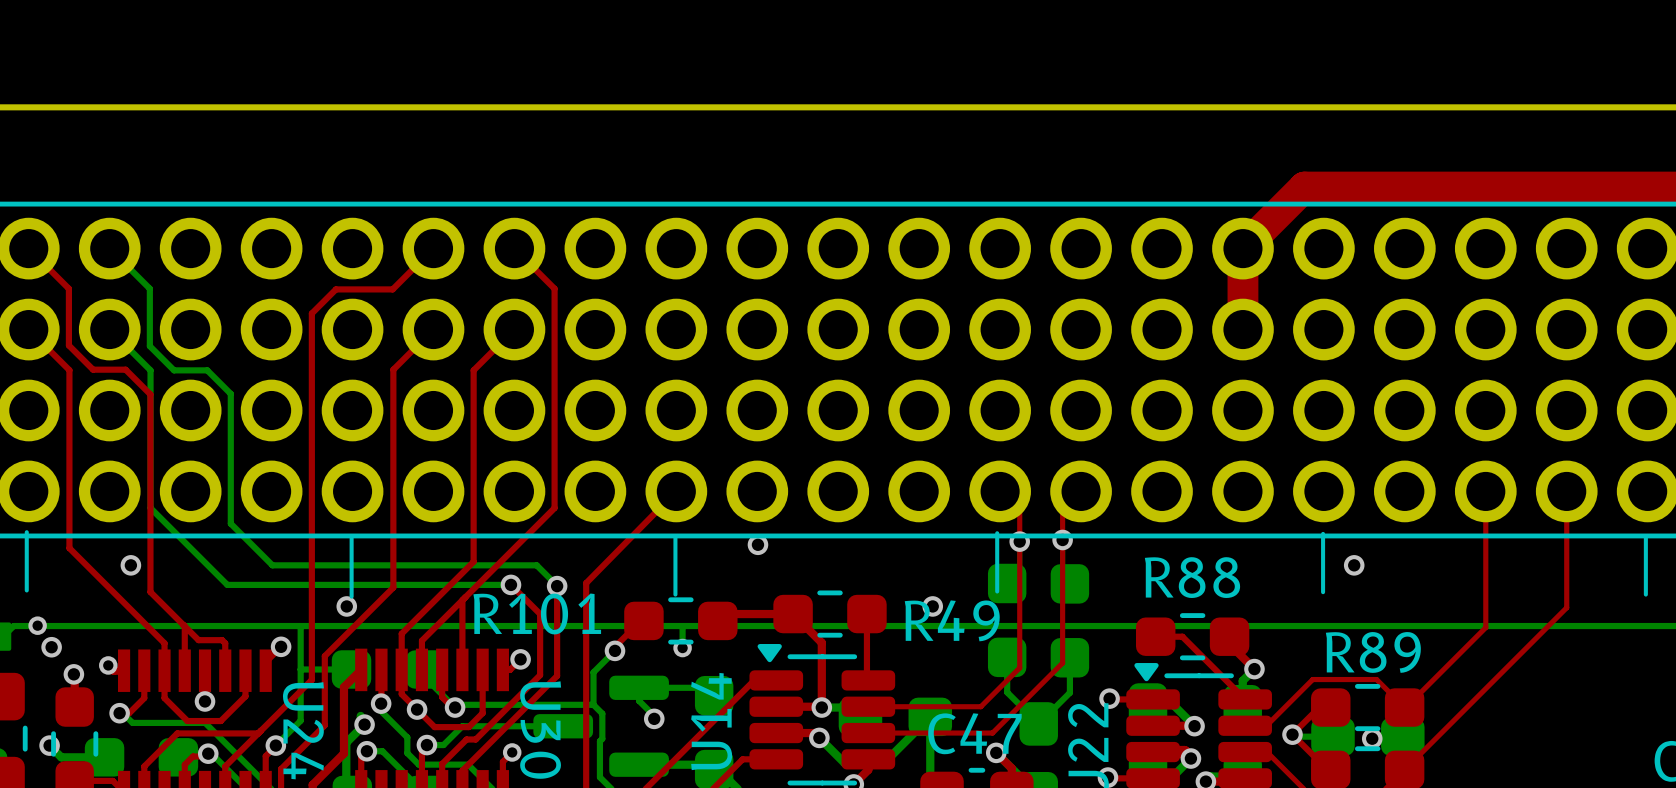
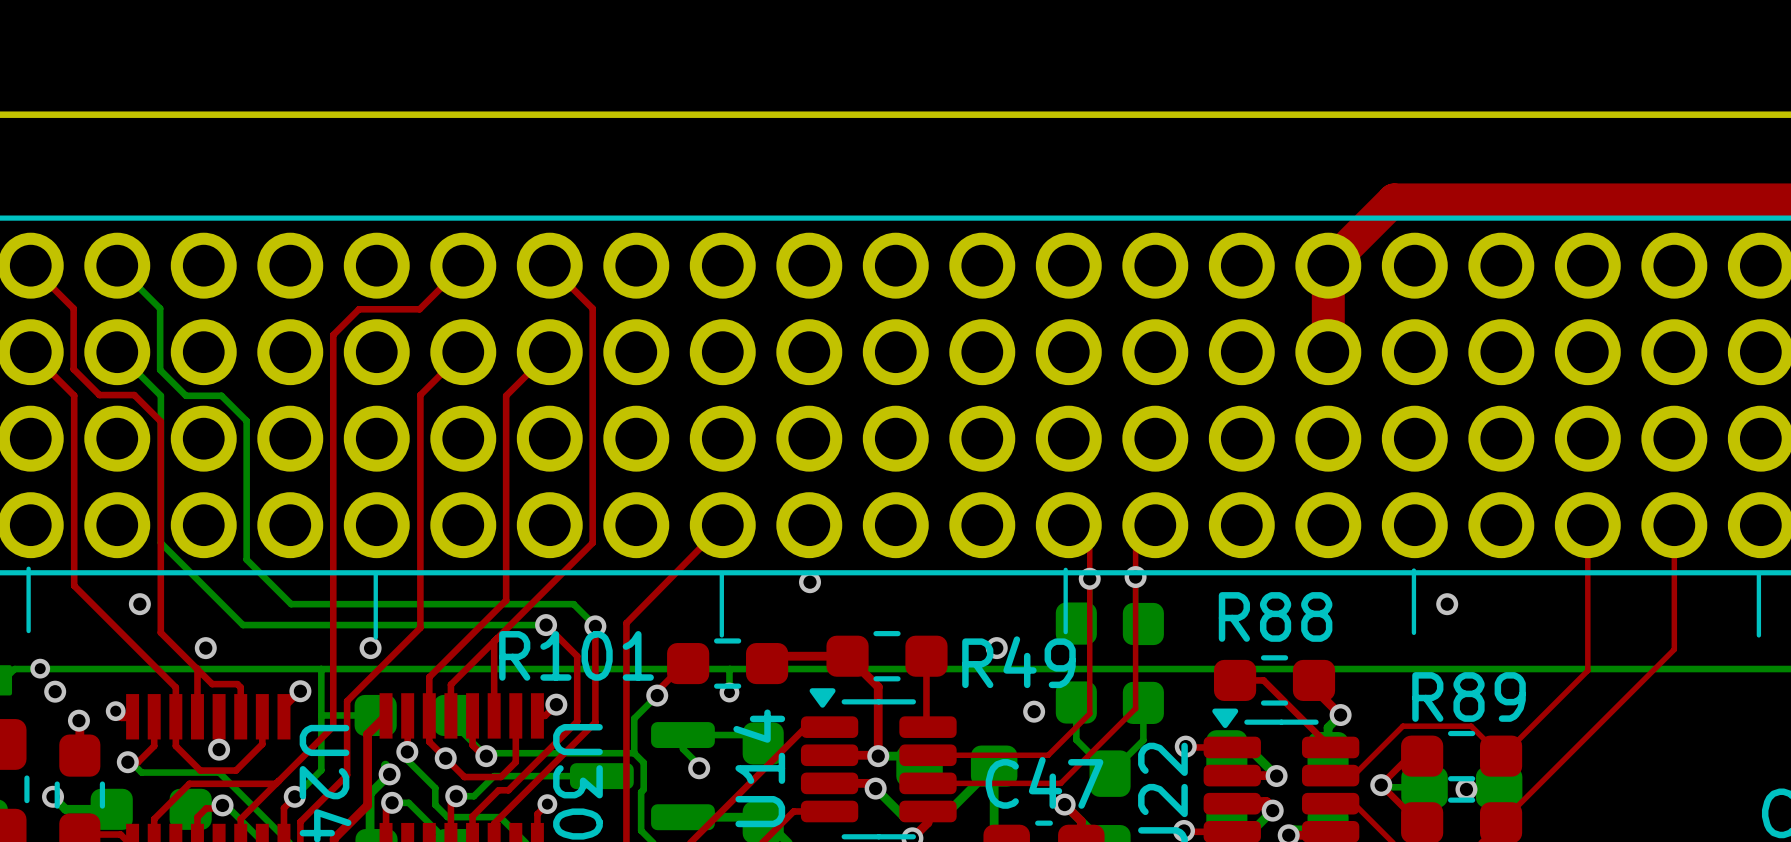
via: none -> (205, 648)
via: none -> (1034, 711)

